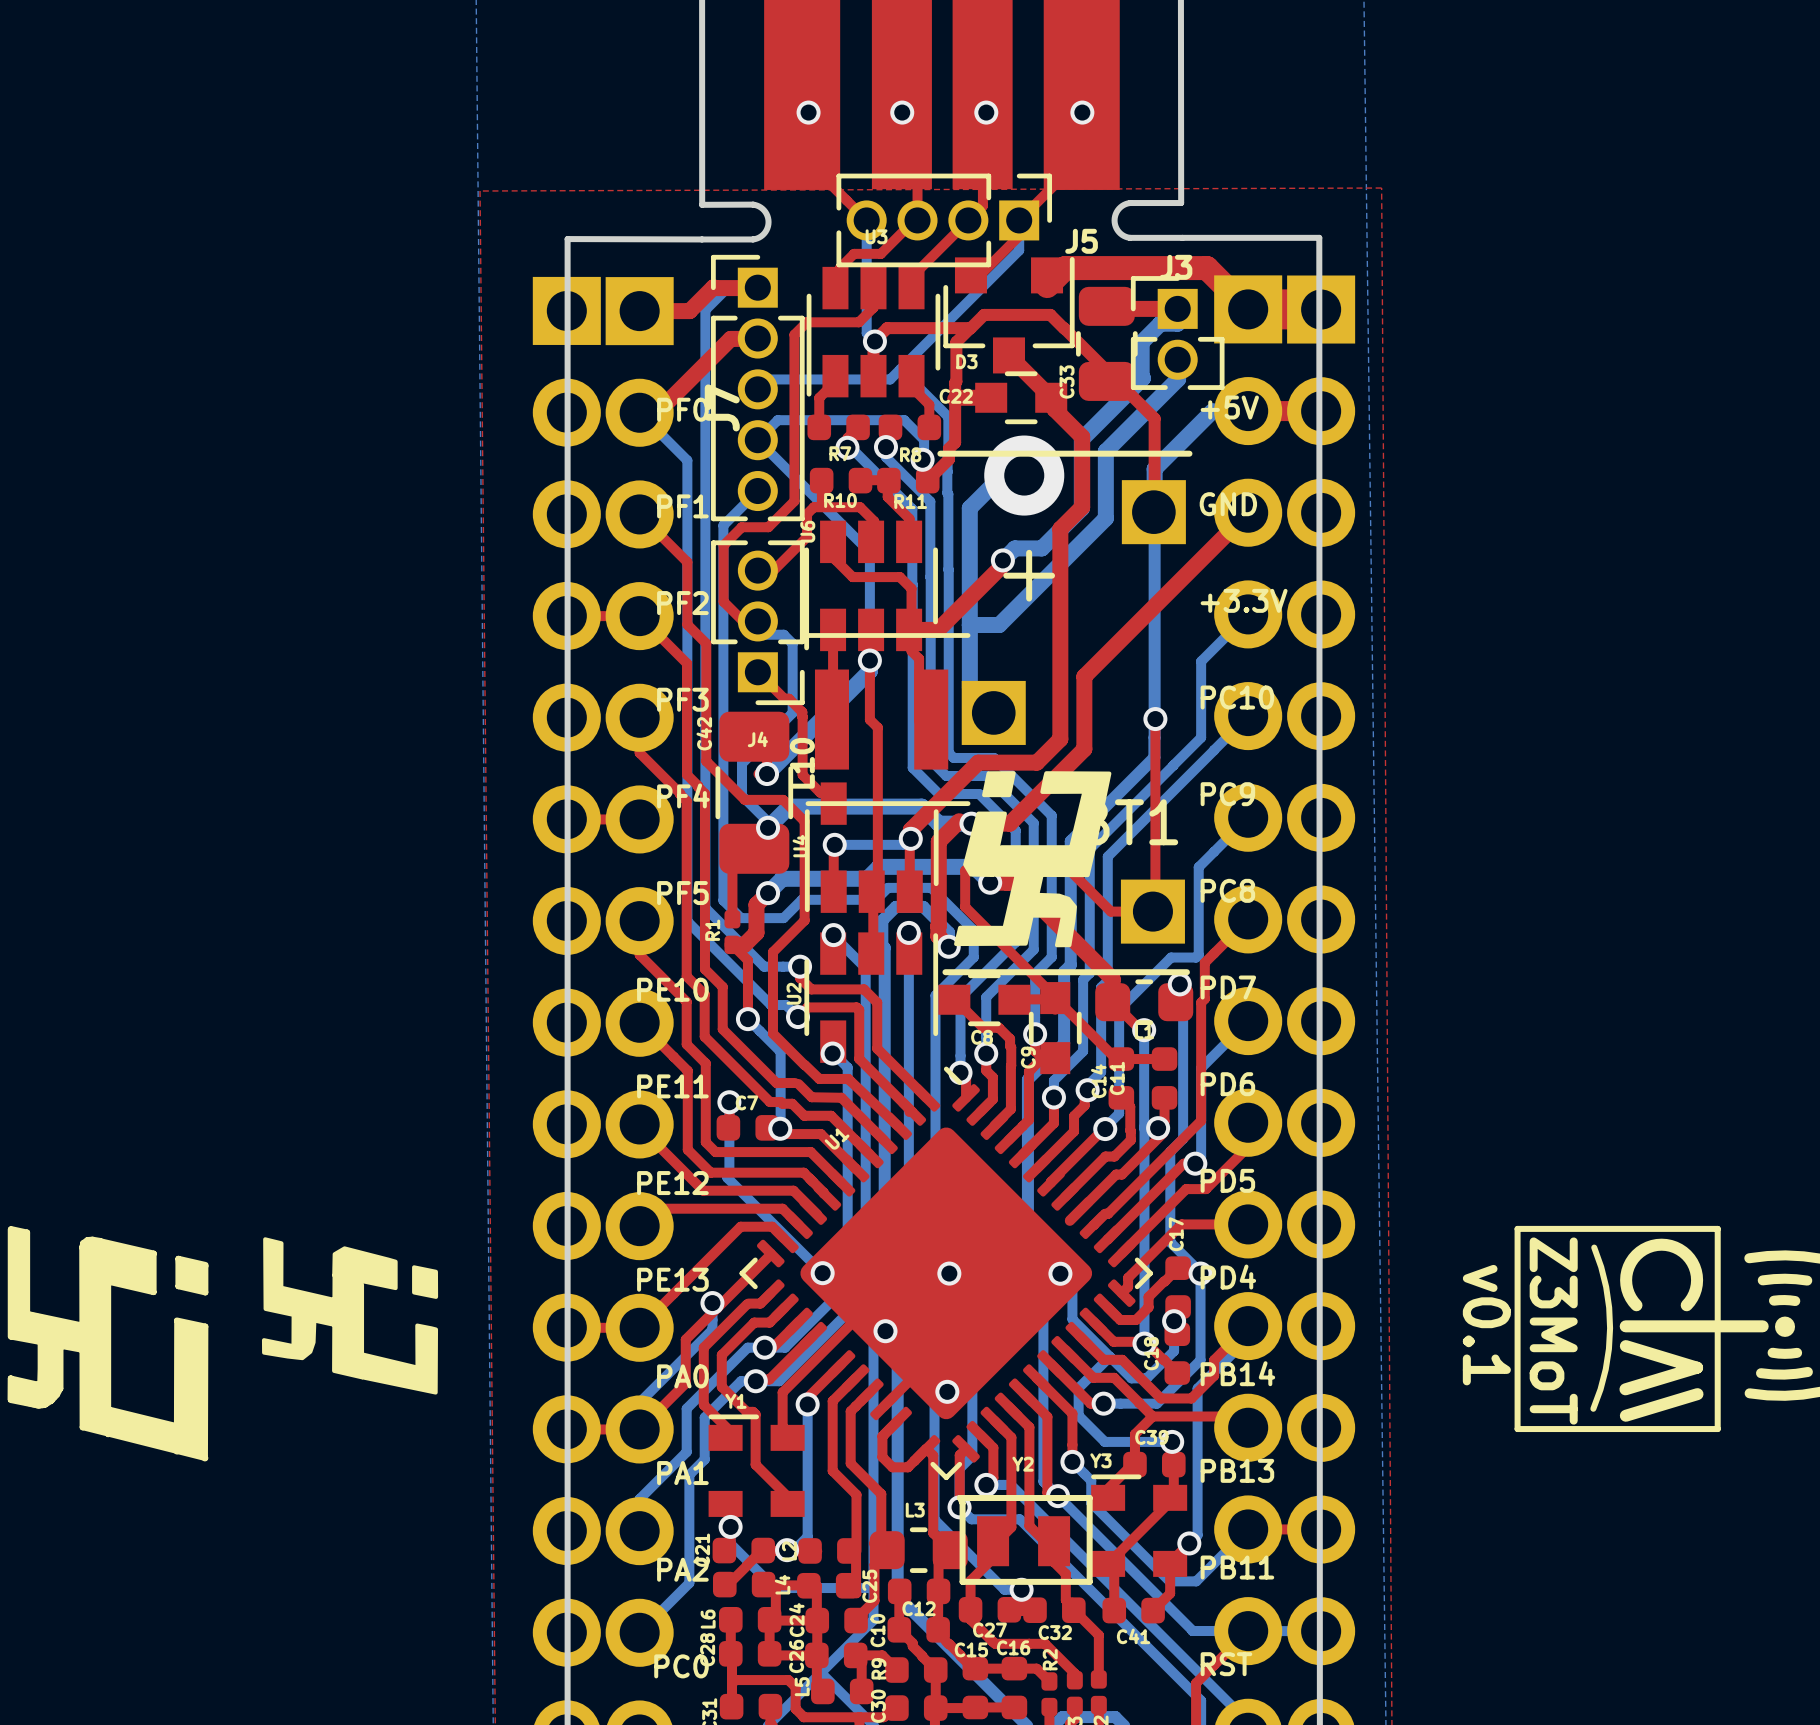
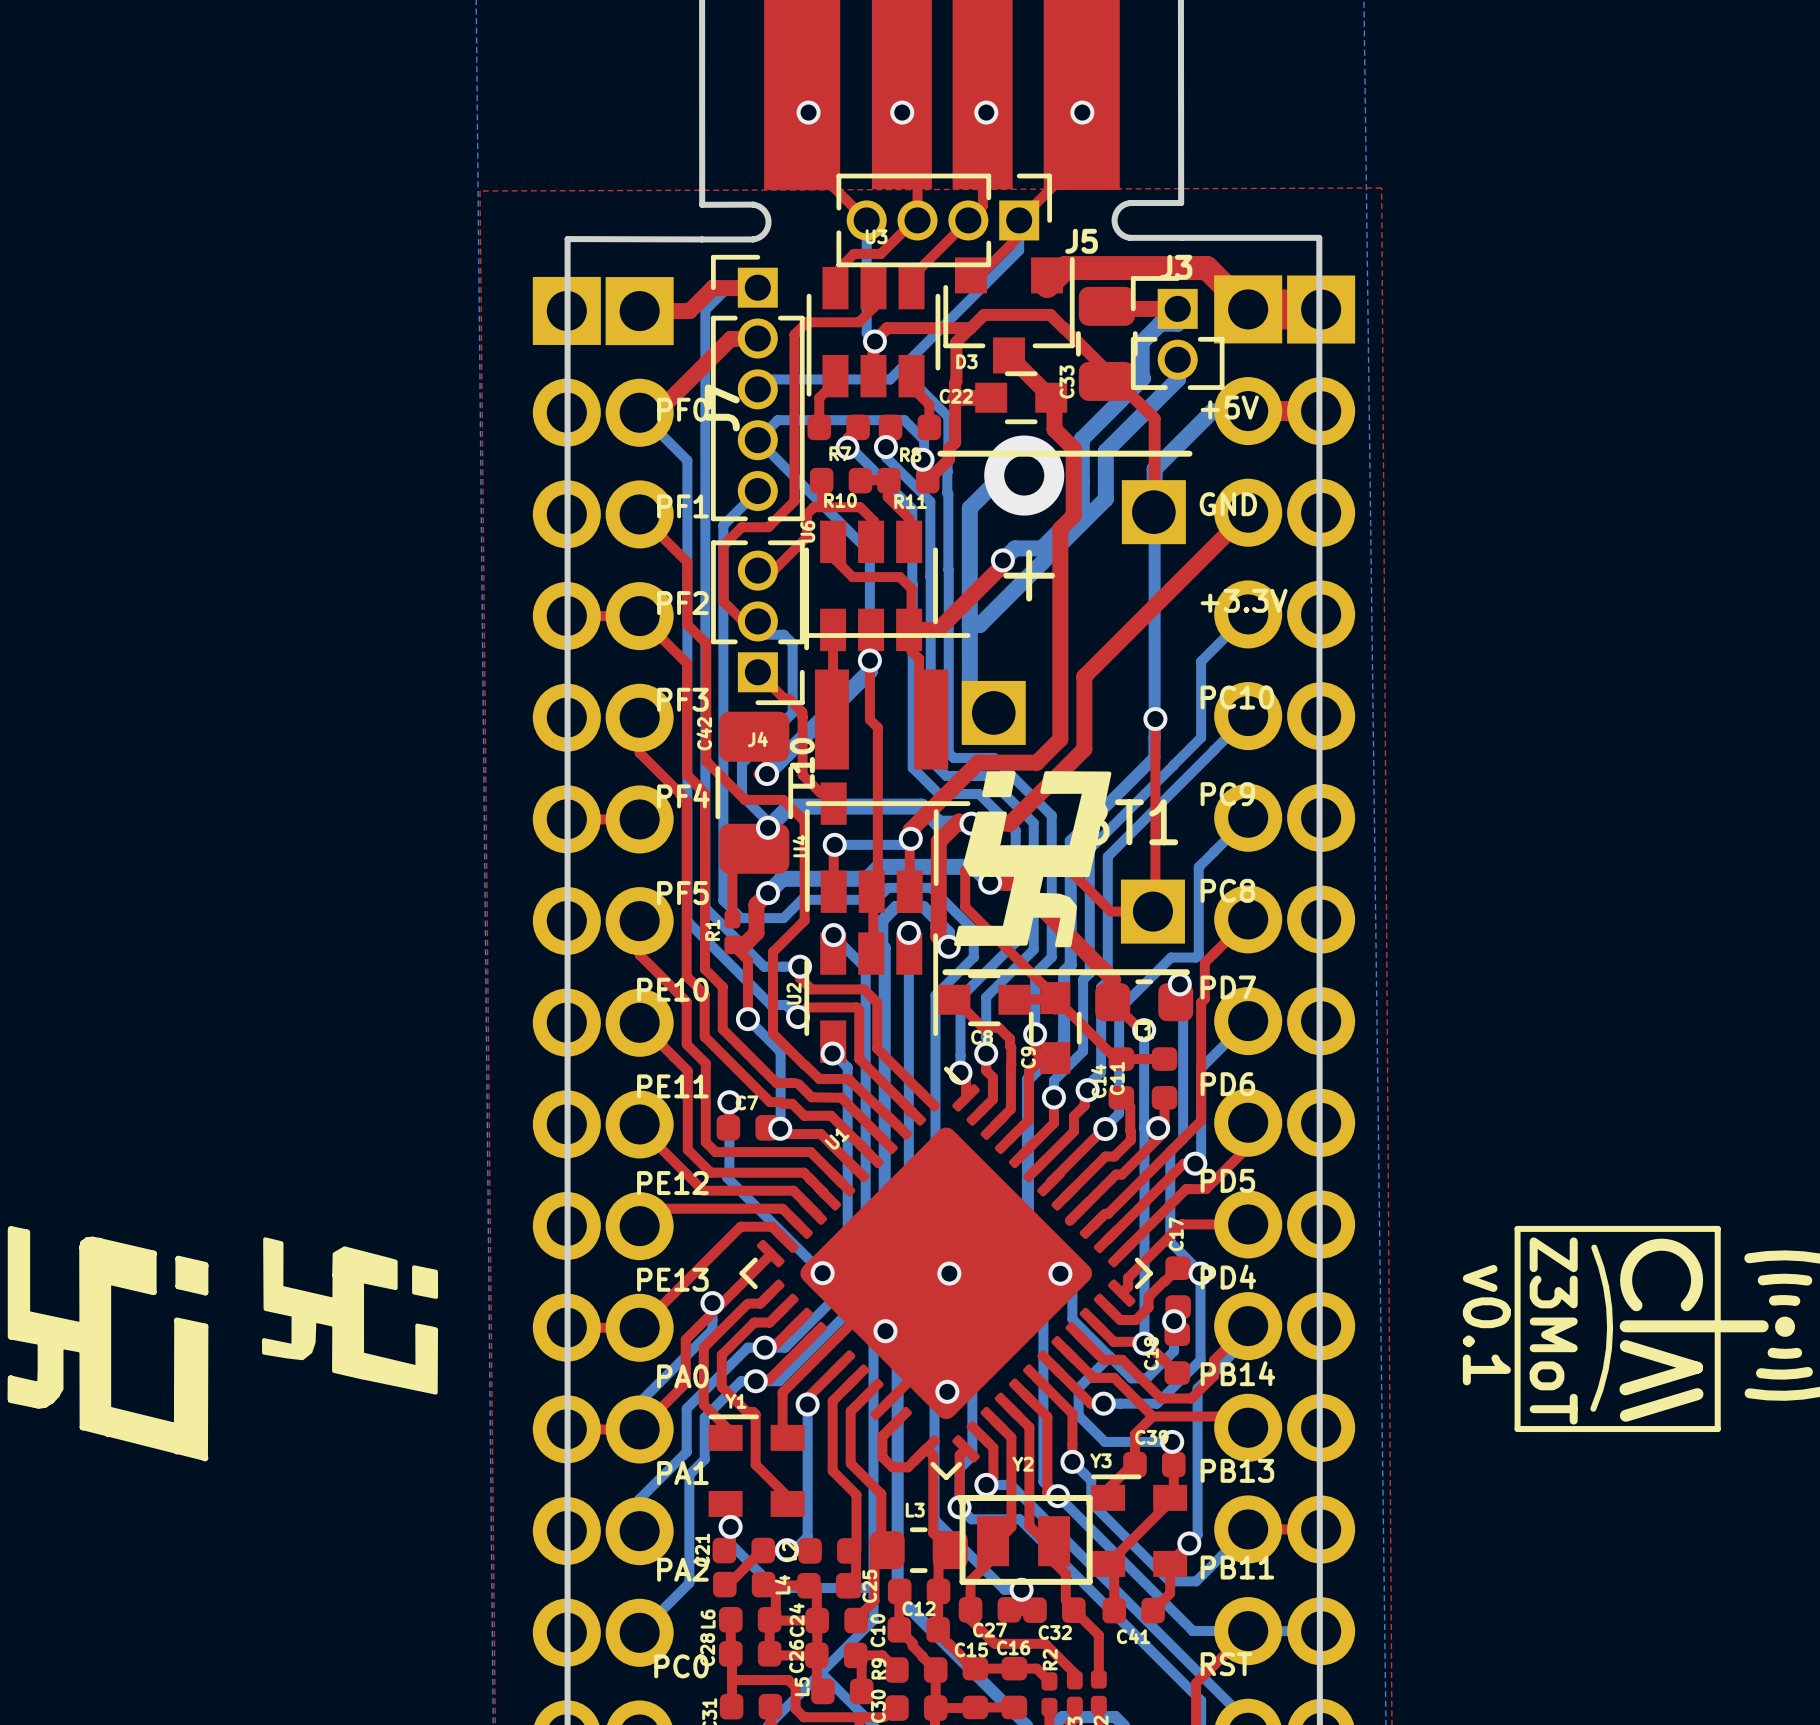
top track: (1054, 409) (1082, 436) (1082, 507) (1073, 515) -> (1054, 409) (1054, 429) (1073, 448) (1073, 515)
bottom track: (1105, 498) (1105, 518) (999, 625) (979, 625) -> (1105, 498) (979, 625)

